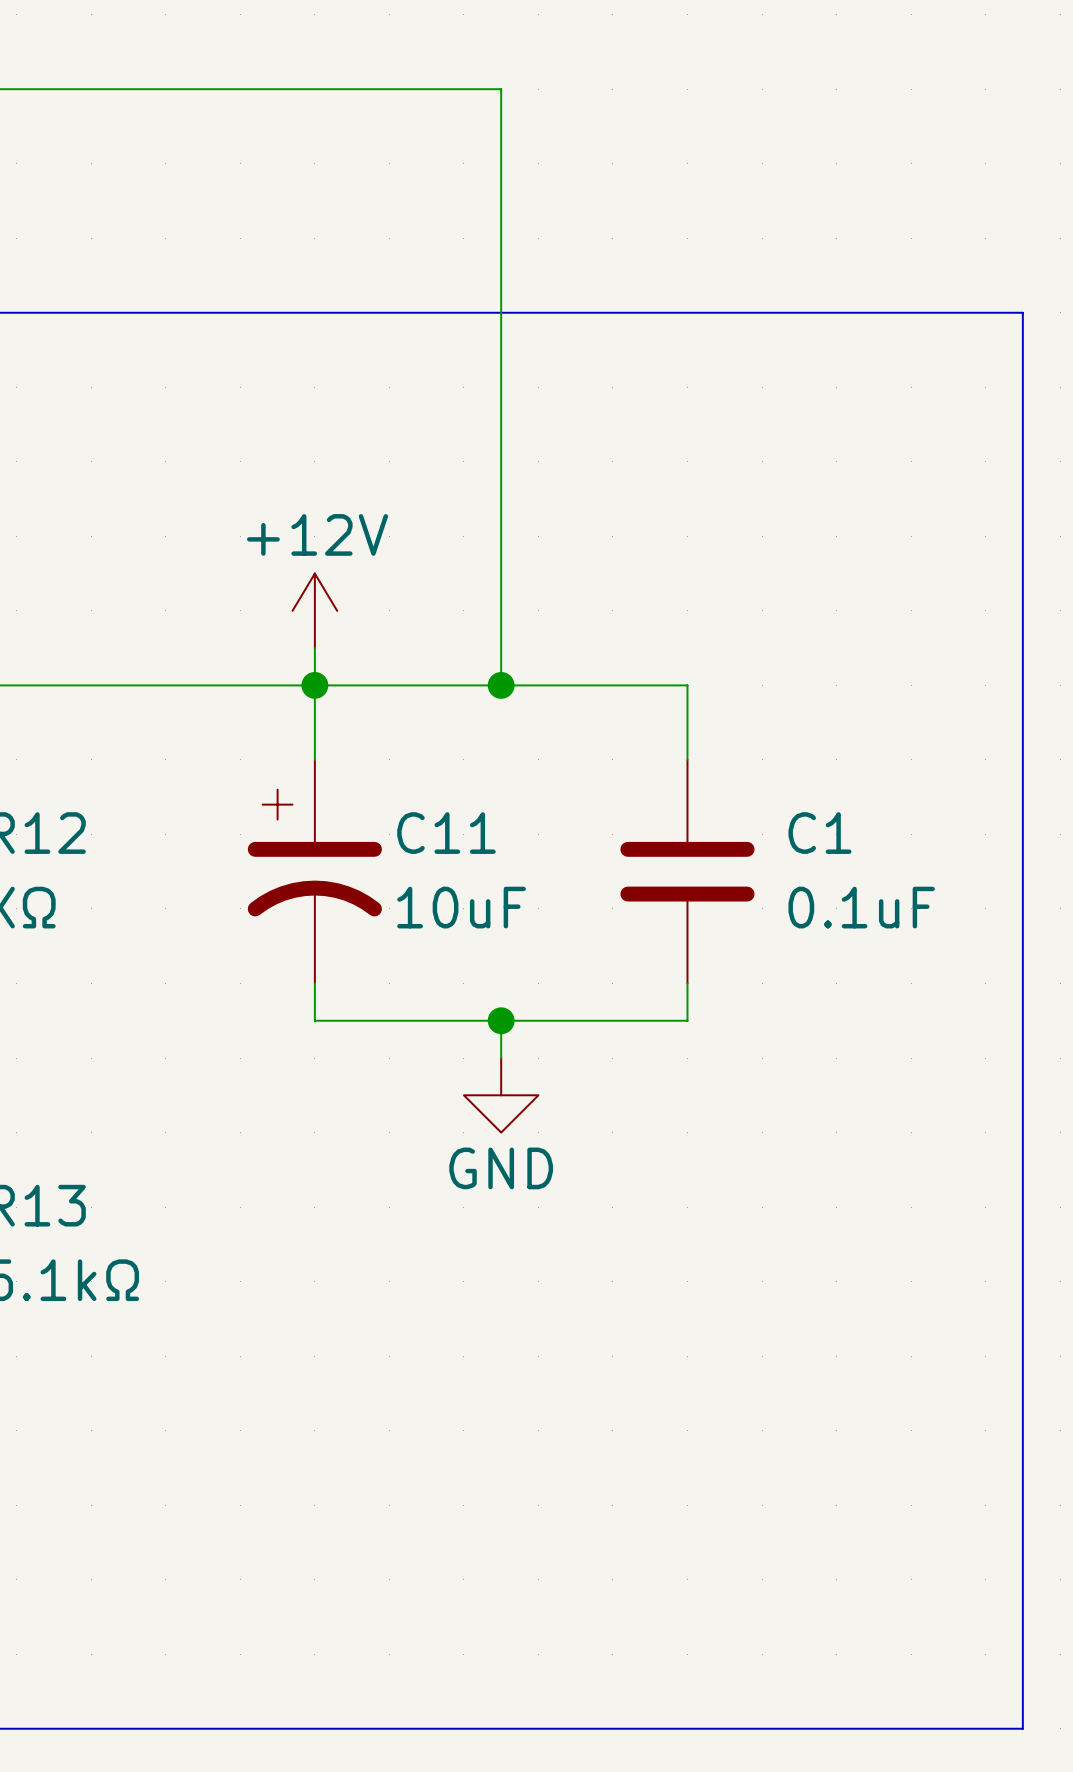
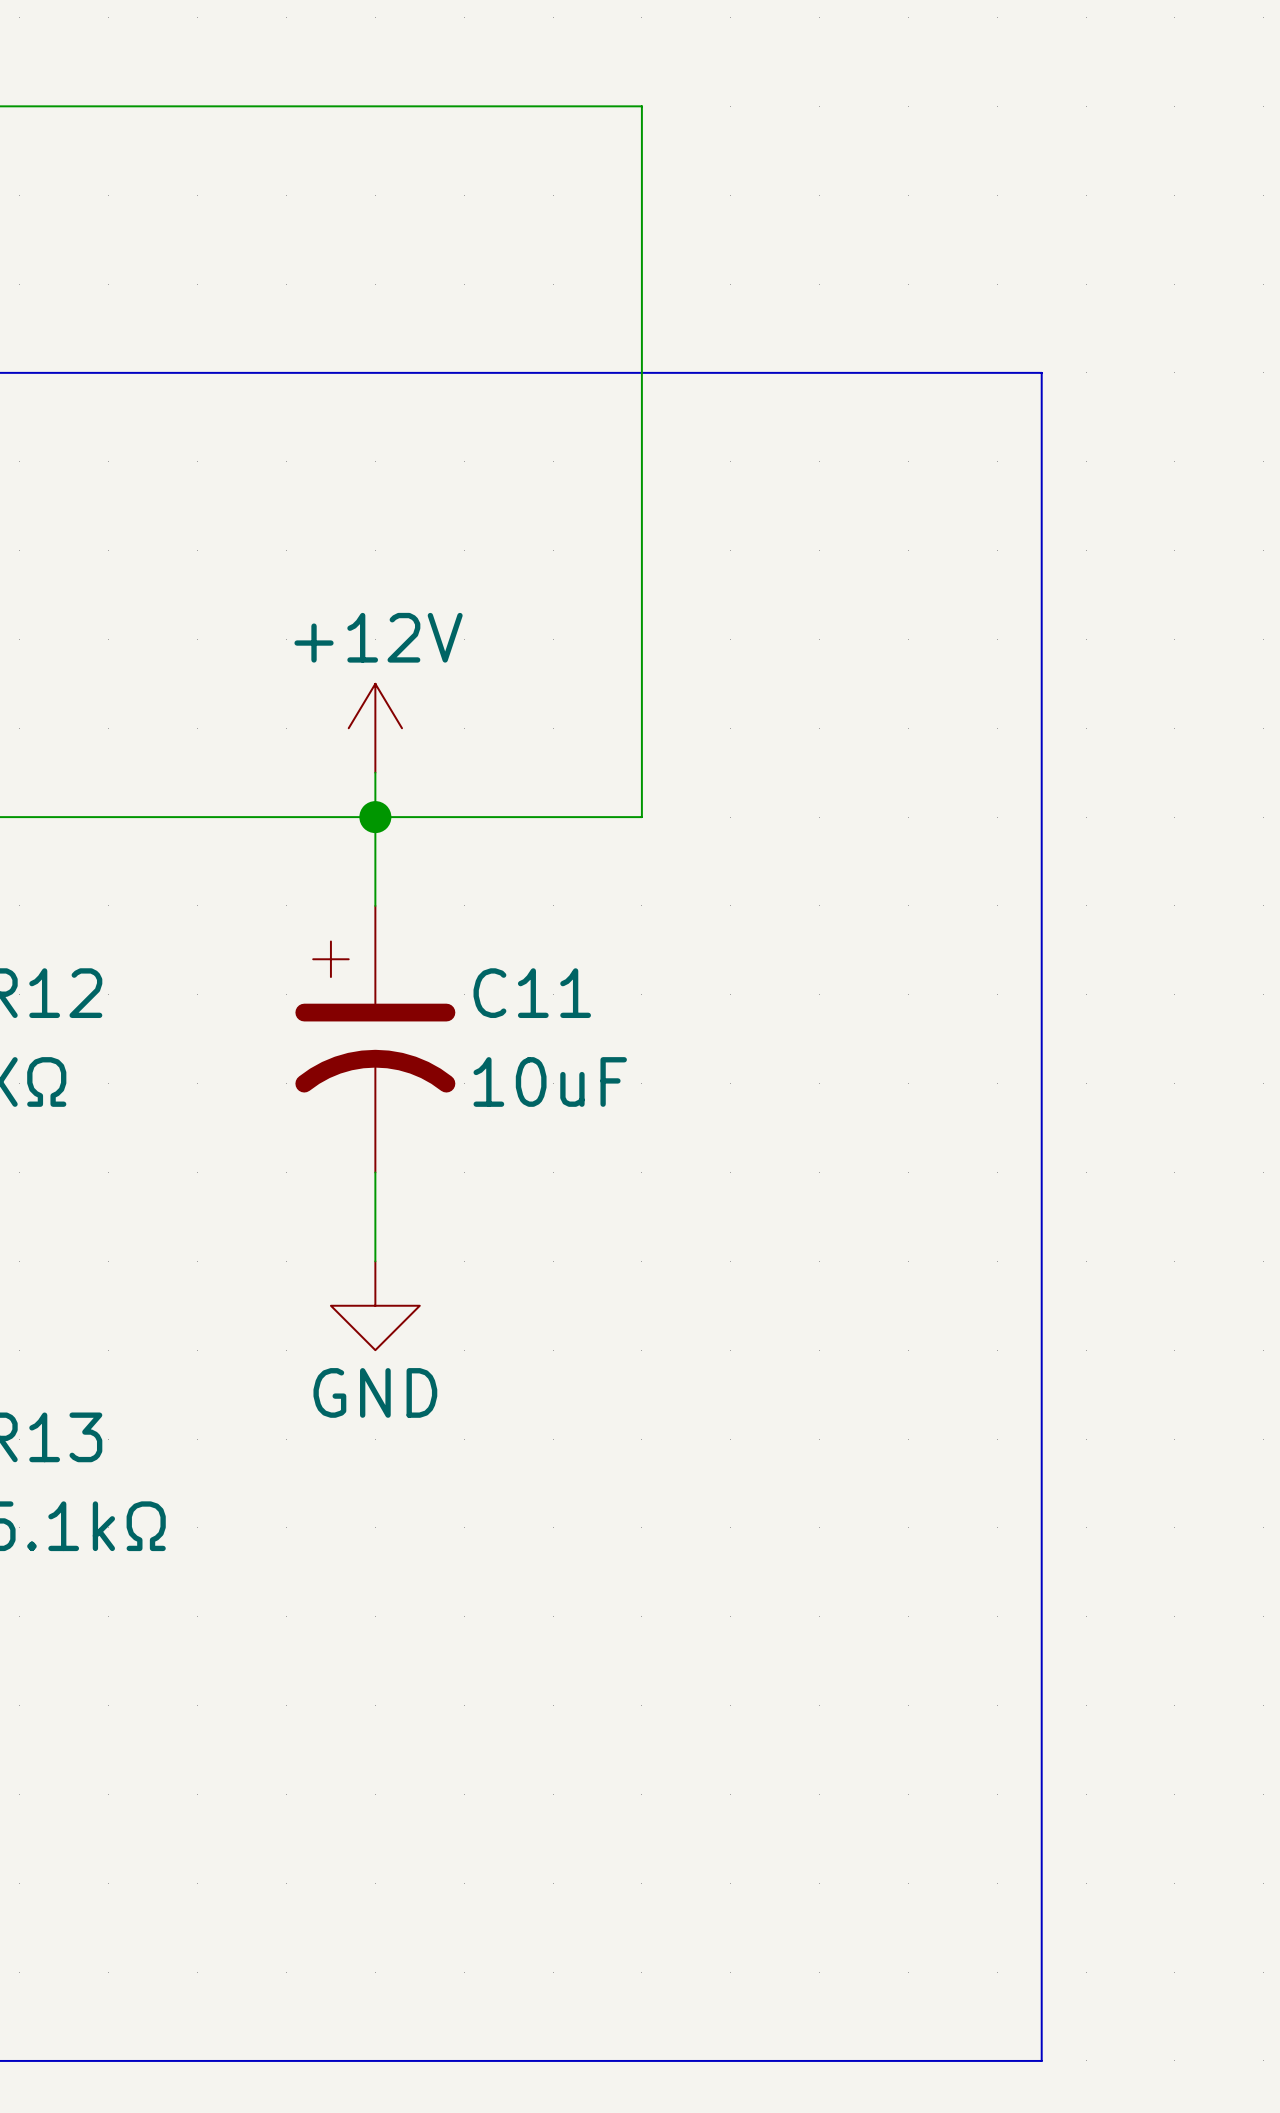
wire: (501, 89) (501, 685) -> (597, 106) (641, 106) (641, 817)
line: (873, 312) (1022, 312) (1022, 1728) (873, 1728) -> (1041, 372) (1041, 2060)
junction: (501, 685) -> none
wire: (538, 685) (687, 685) (687, 759) -> none
C1: 0.1uF (687, 871) -> none
wire: (687, 983) (687, 1020) (314, 1020) -> (375, 1261) (375, 1216)
wire: (501, 1020) (501, 1058) -> none
junction: (501, 1020) -> none
power symbol position: GND (501, 1095) -> GND (375, 1305)

